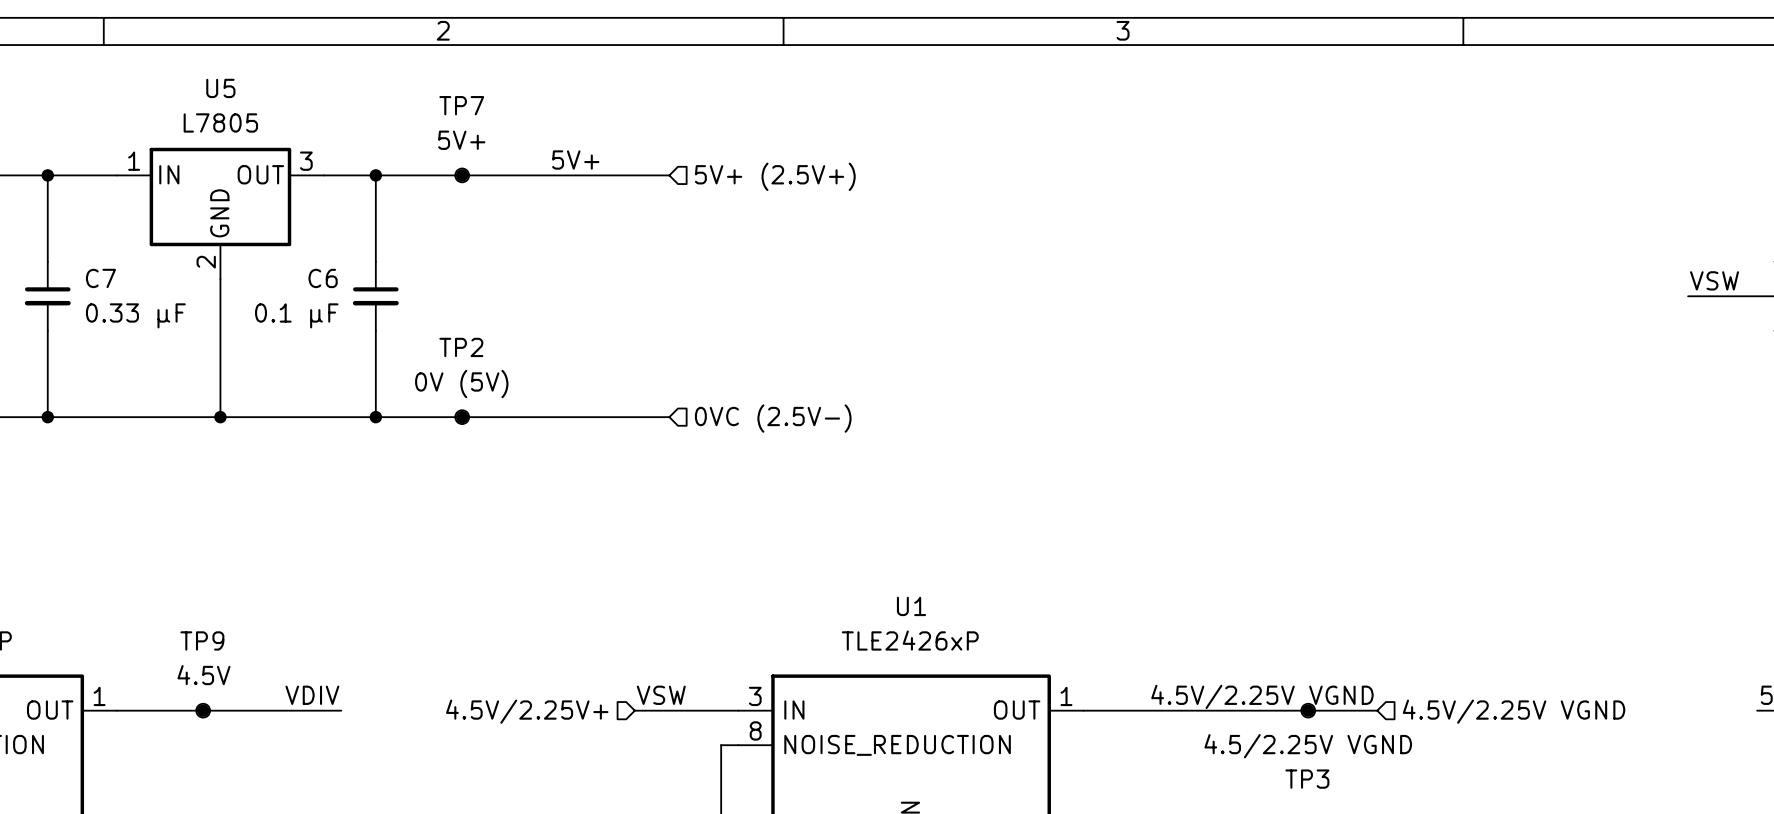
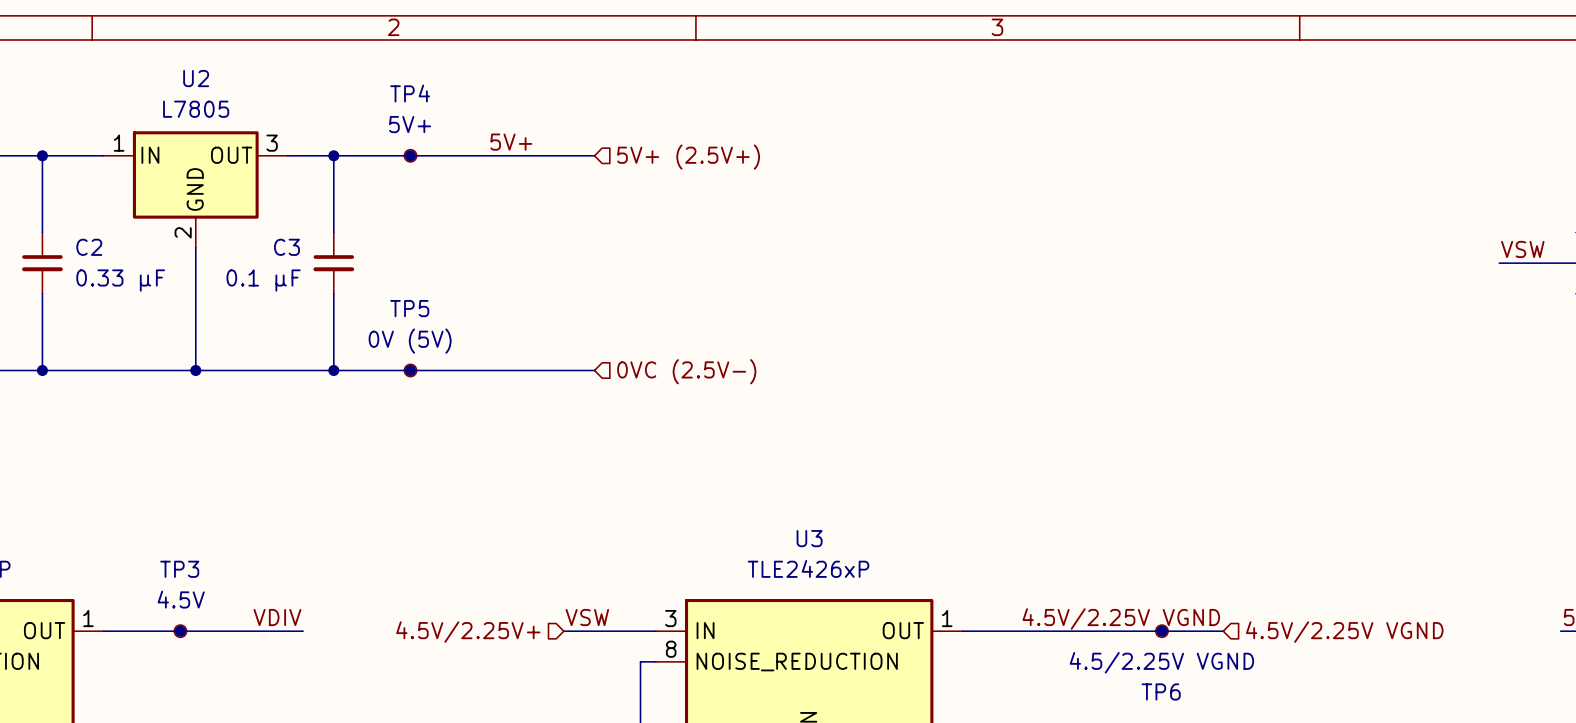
U5 name: U5 (220, 88) -> U2 (196, 78)
TP7 name: TP7 (461, 105) -> TP4 (410, 93)
C7 name: C7 (100, 278) -> C2 (89, 247)
C6 name: C6 (323, 278) -> C3 (286, 247)
TP2 name: TP2 (461, 347) -> TP5 (409, 308)
U1 name: U1 (911, 606) -> U3 (809, 538)
TP9 name: TP9 (202, 640) -> TP3 (179, 569)
TP3 name: TP3 (1307, 779) -> TP6 (1161, 691)

